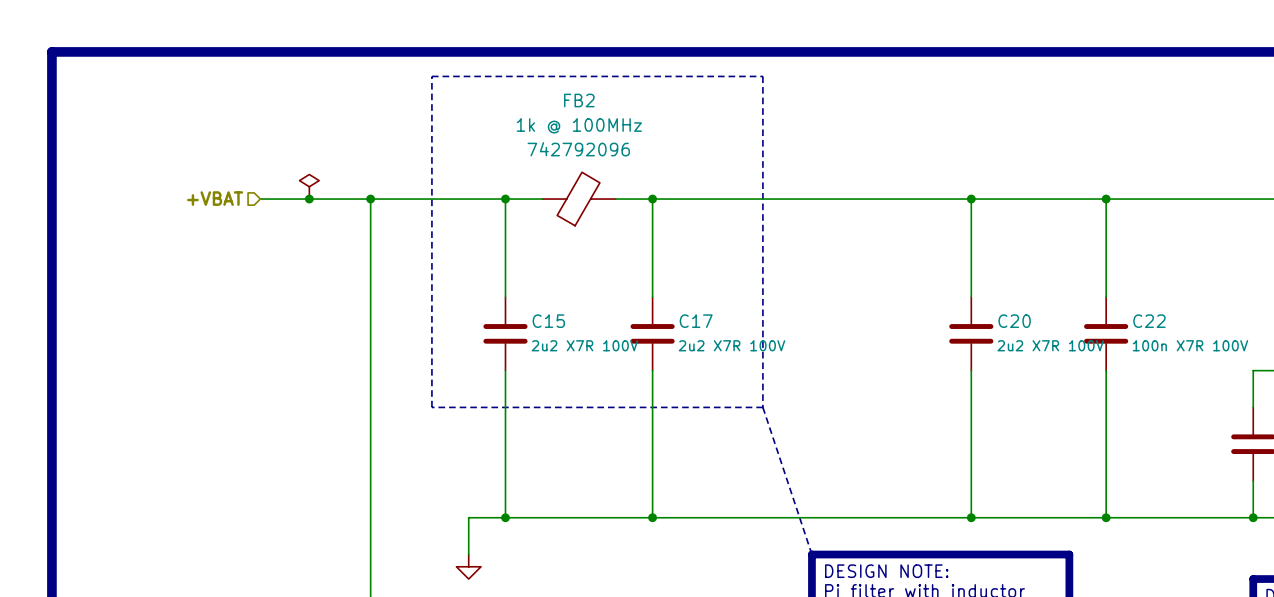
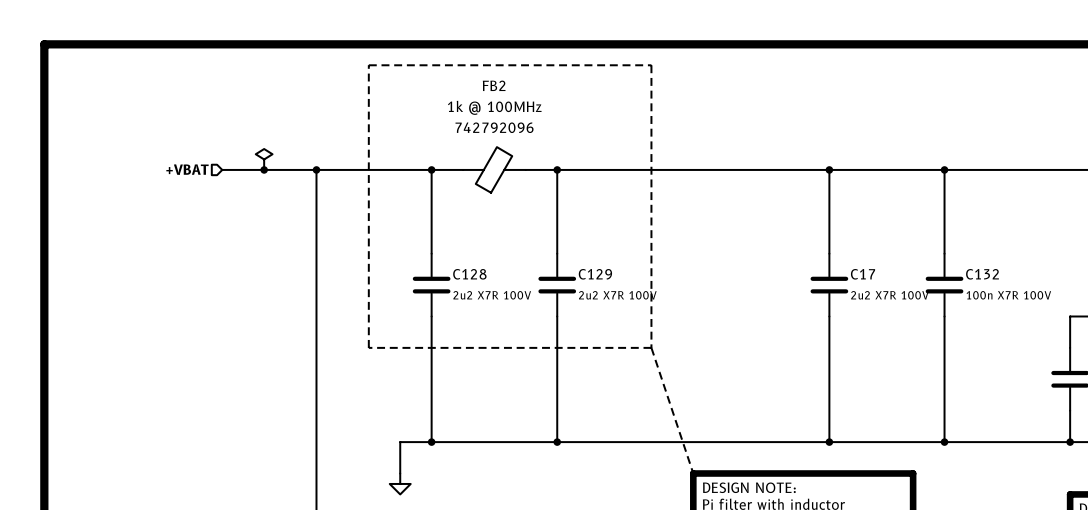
C15 name: C15 (548, 321) -> C128 (469, 274)
C17 name: C17 (696, 321) -> C129 (595, 274)
C20 name: C20 (1014, 321) -> C17 (863, 274)
C22 name: C22 (1149, 321) -> C132 (982, 274)

